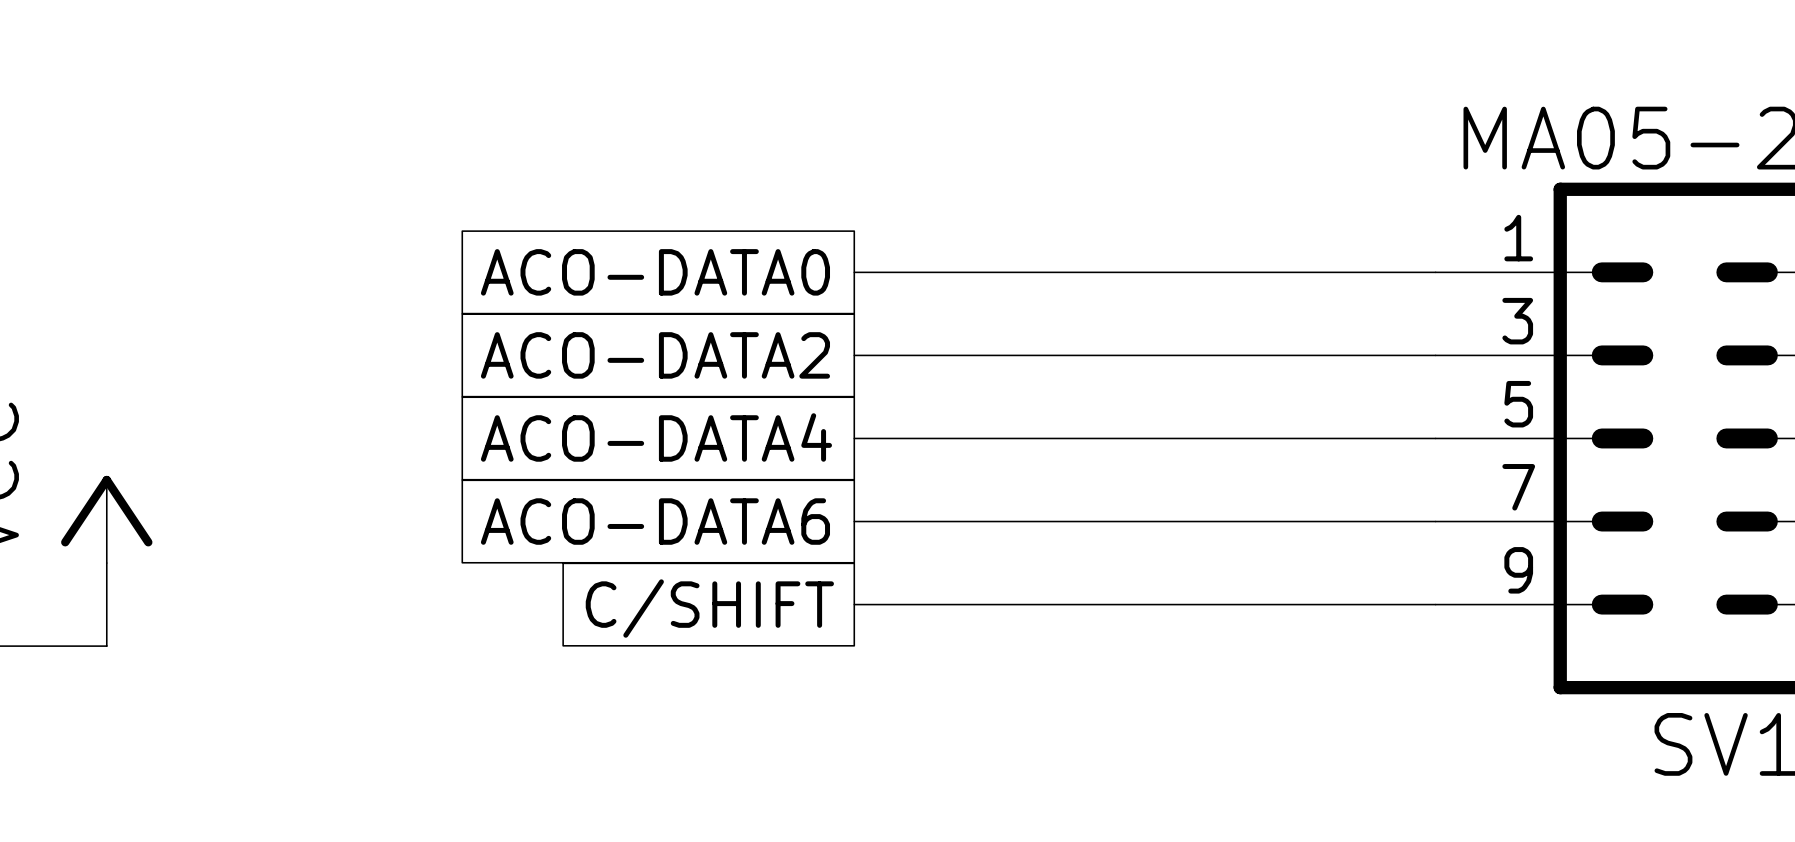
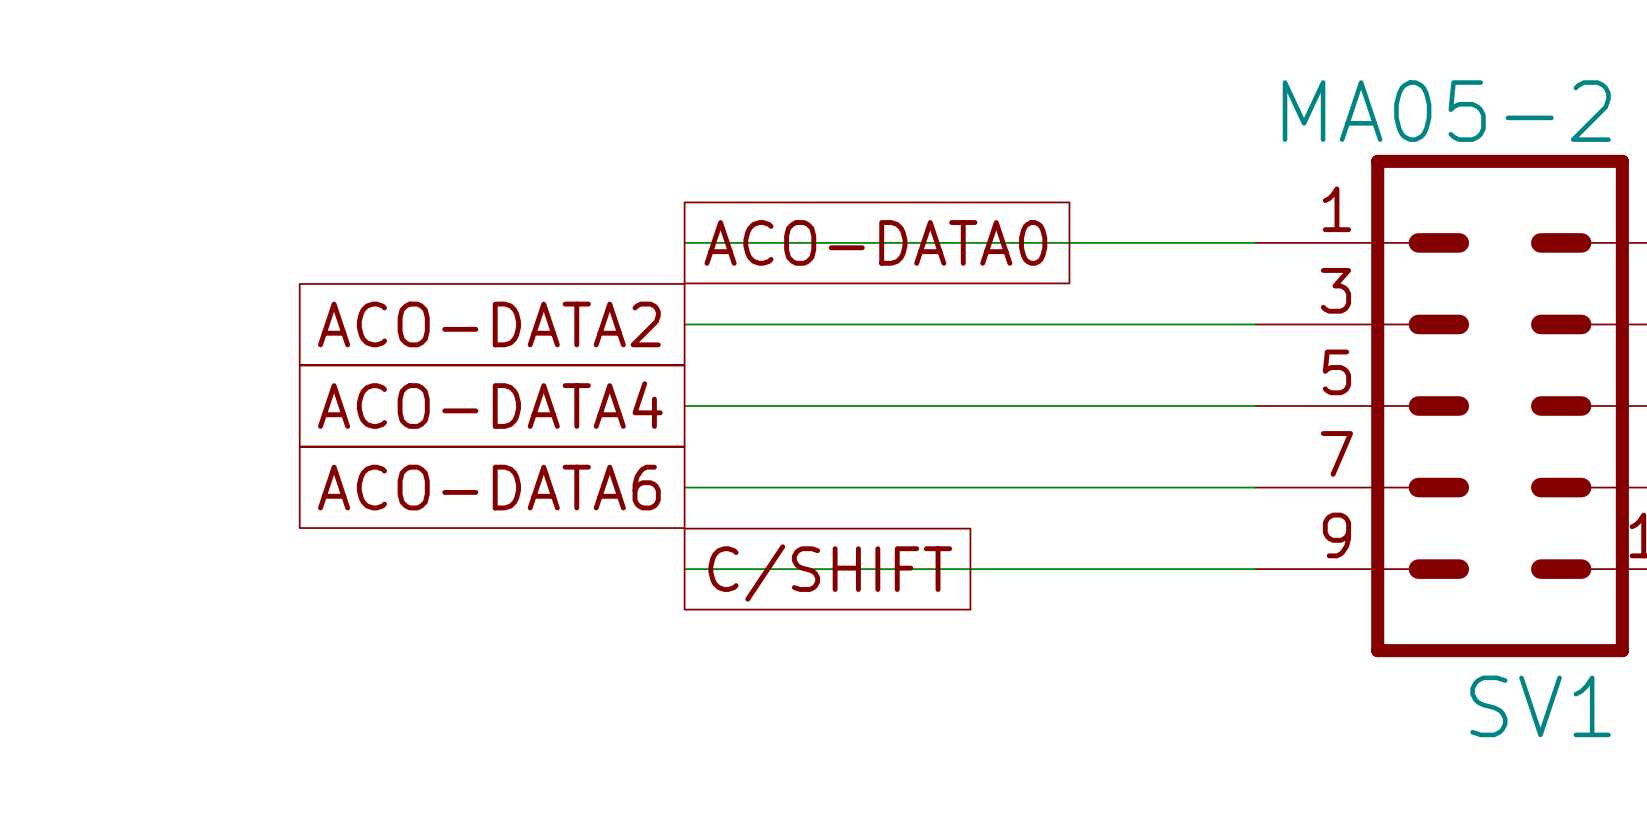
global label rotation: 0° (655, 272) -> 180° (875, 242)
global label position: ACO-DATA0 (655, 272) -> ACO-DATA0 (875, 242)
global label rotation: 0° (709, 608) -> 180° (830, 572)

